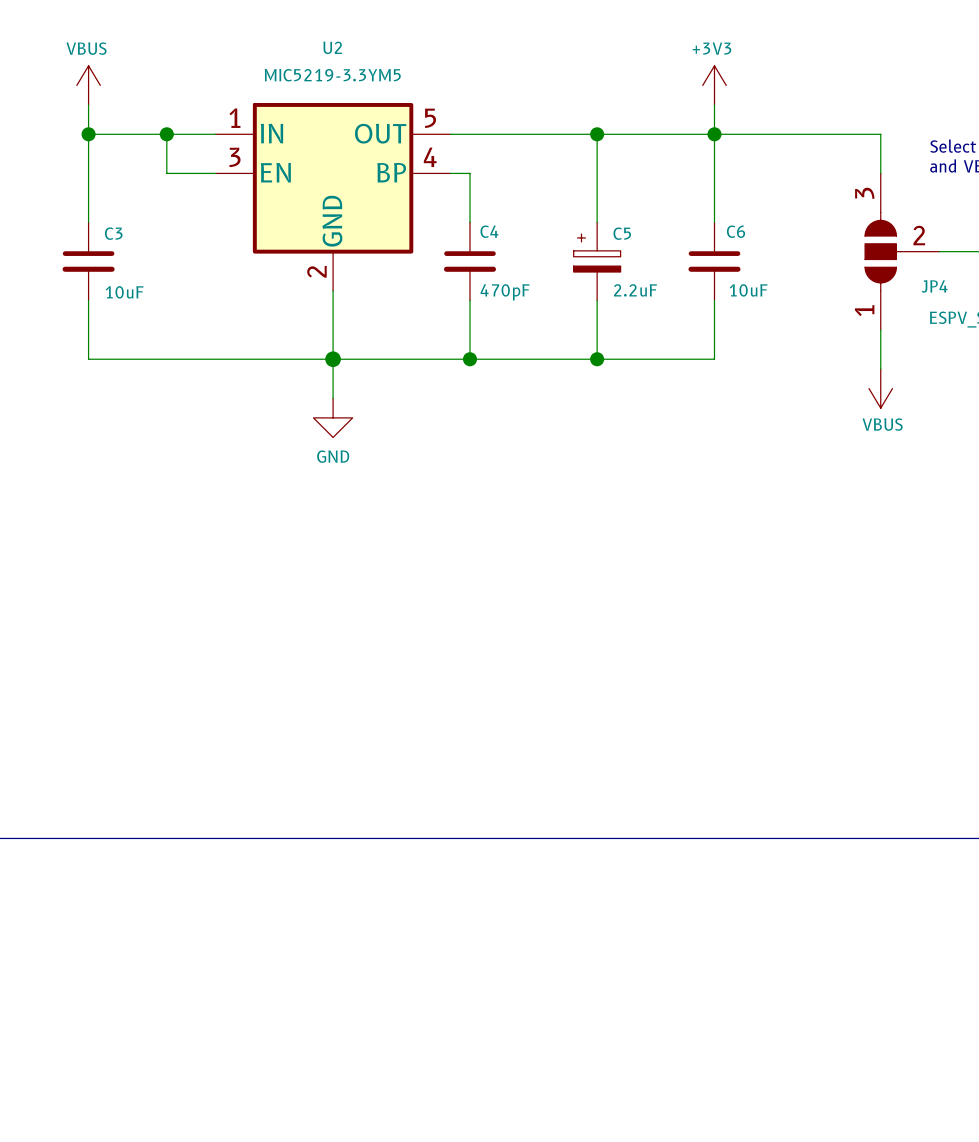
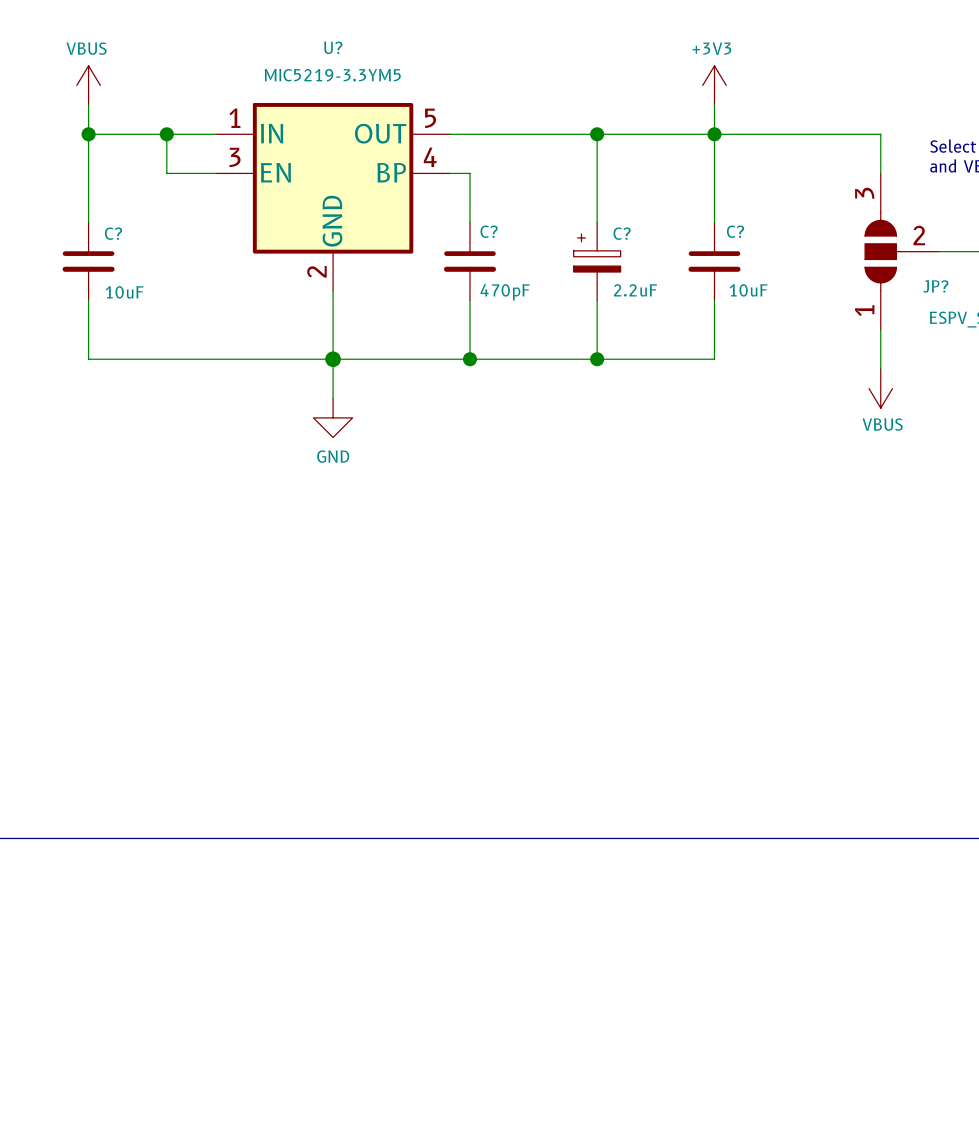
U2 name: U2 (332, 47) -> U? (333, 47)
C4 name: C4 (489, 231) -> C? (489, 231)
C6 name: C6 (736, 231) -> C? (735, 231)
C3 name: C3 (113, 233) -> C? (113, 233)
C5 name: C5 (622, 233) -> C? (622, 233)
JP4 name: JP4 (934, 286) -> JP? (935, 286)

